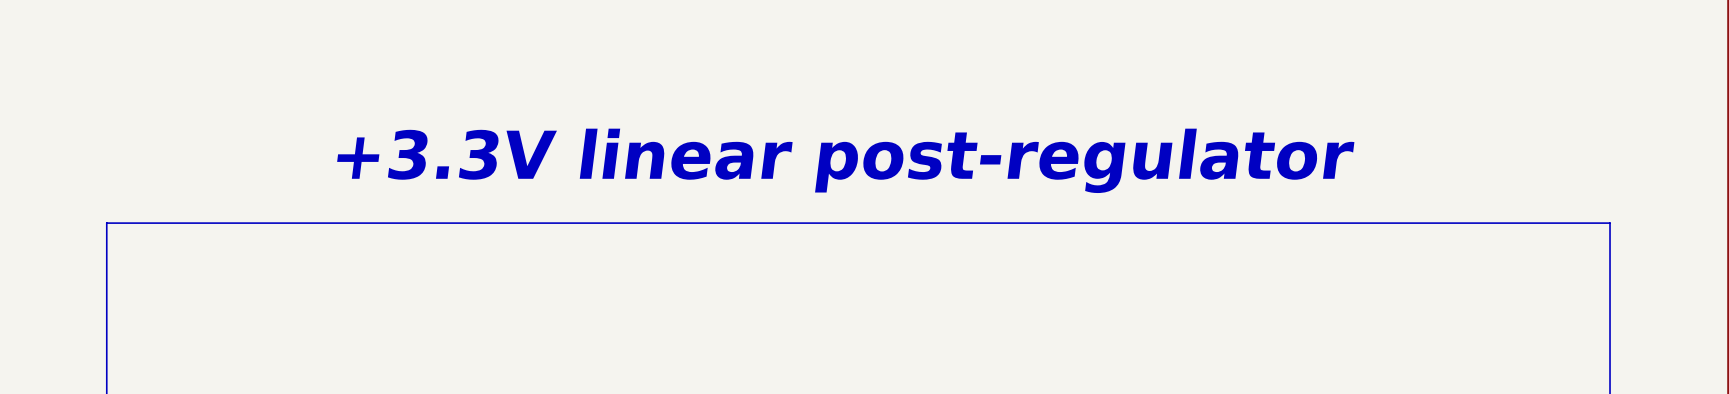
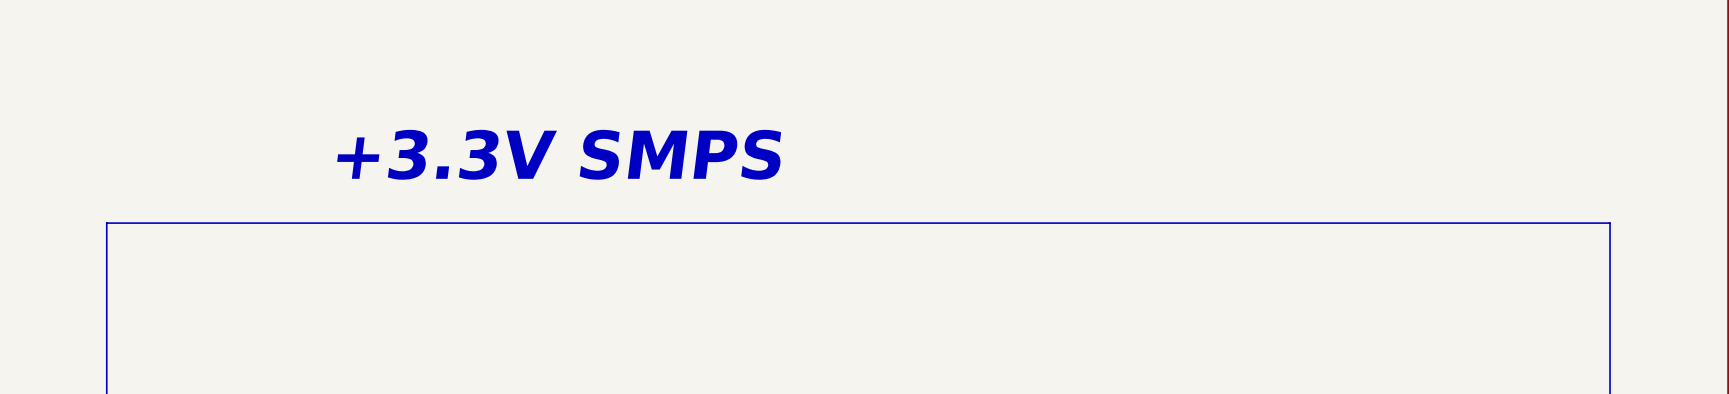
text: +3.3V linear post-regulator (845, 160) -> +3.3V SMPS (559, 154)

